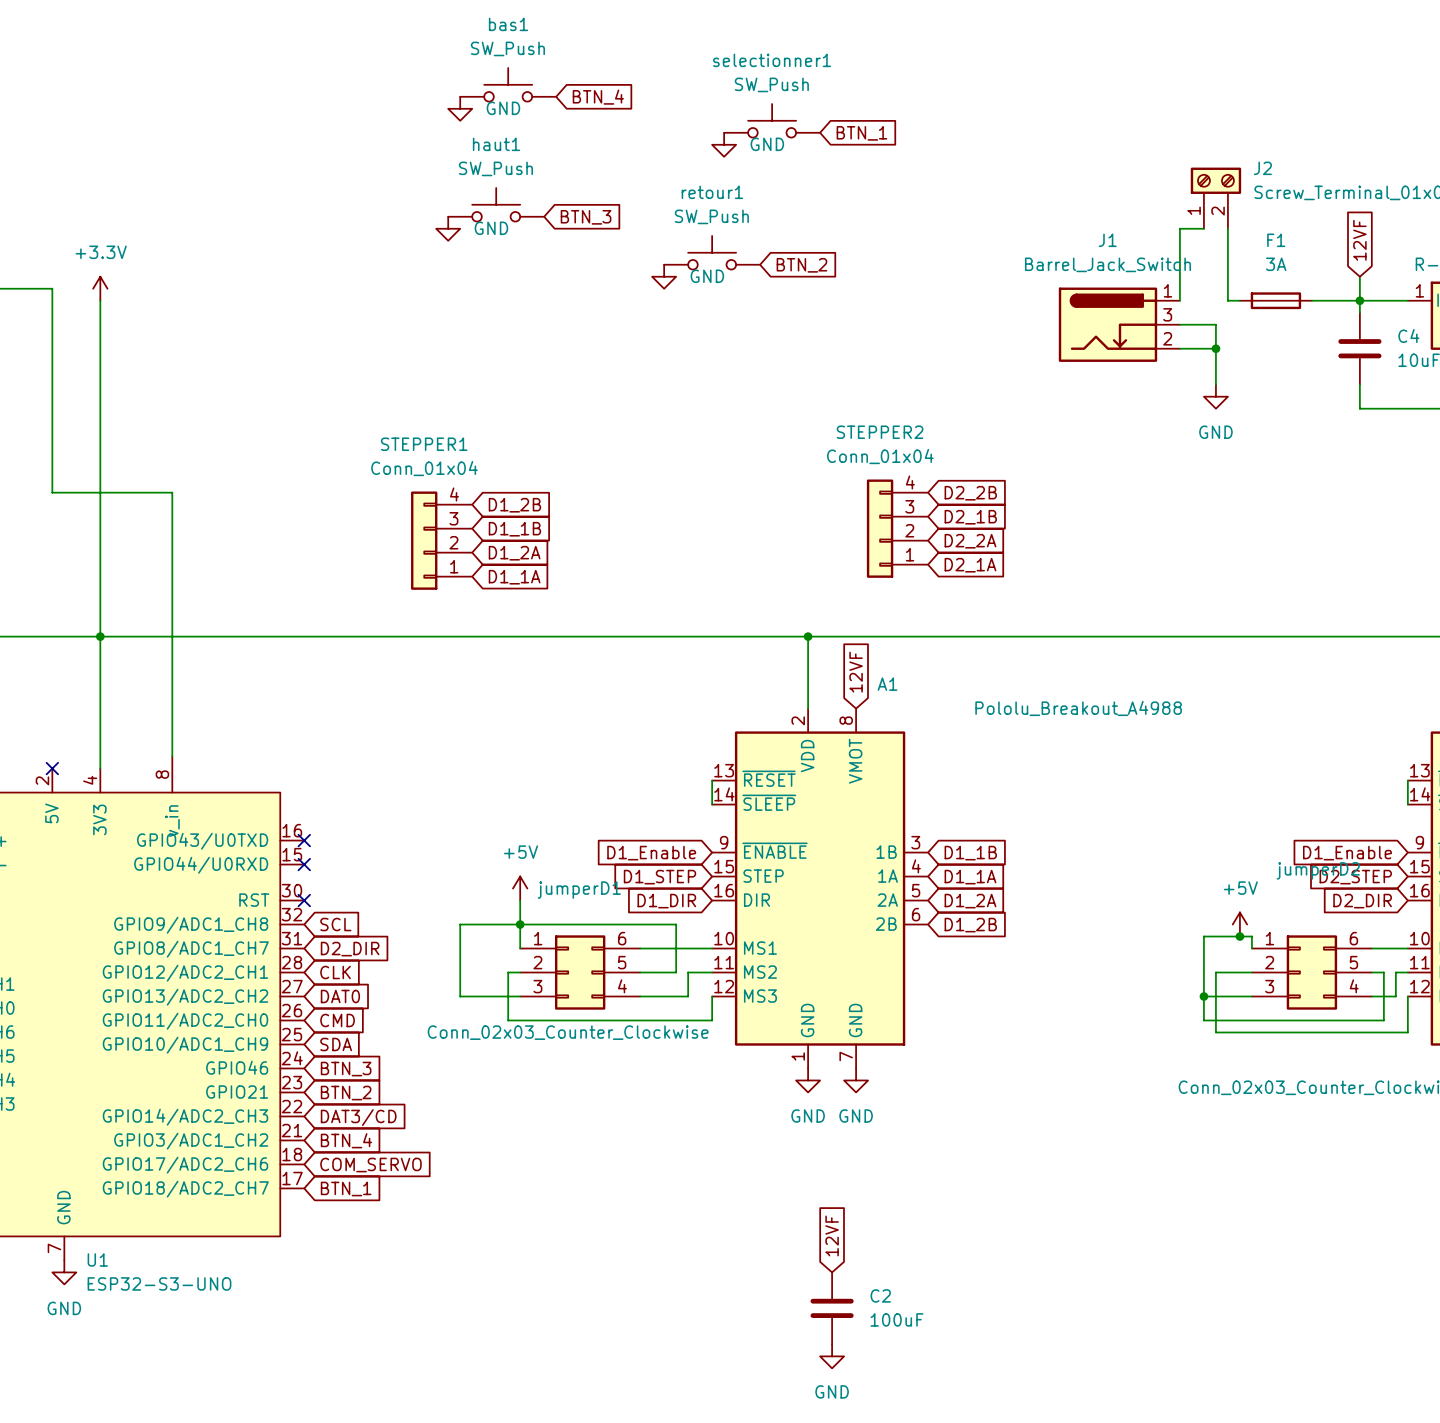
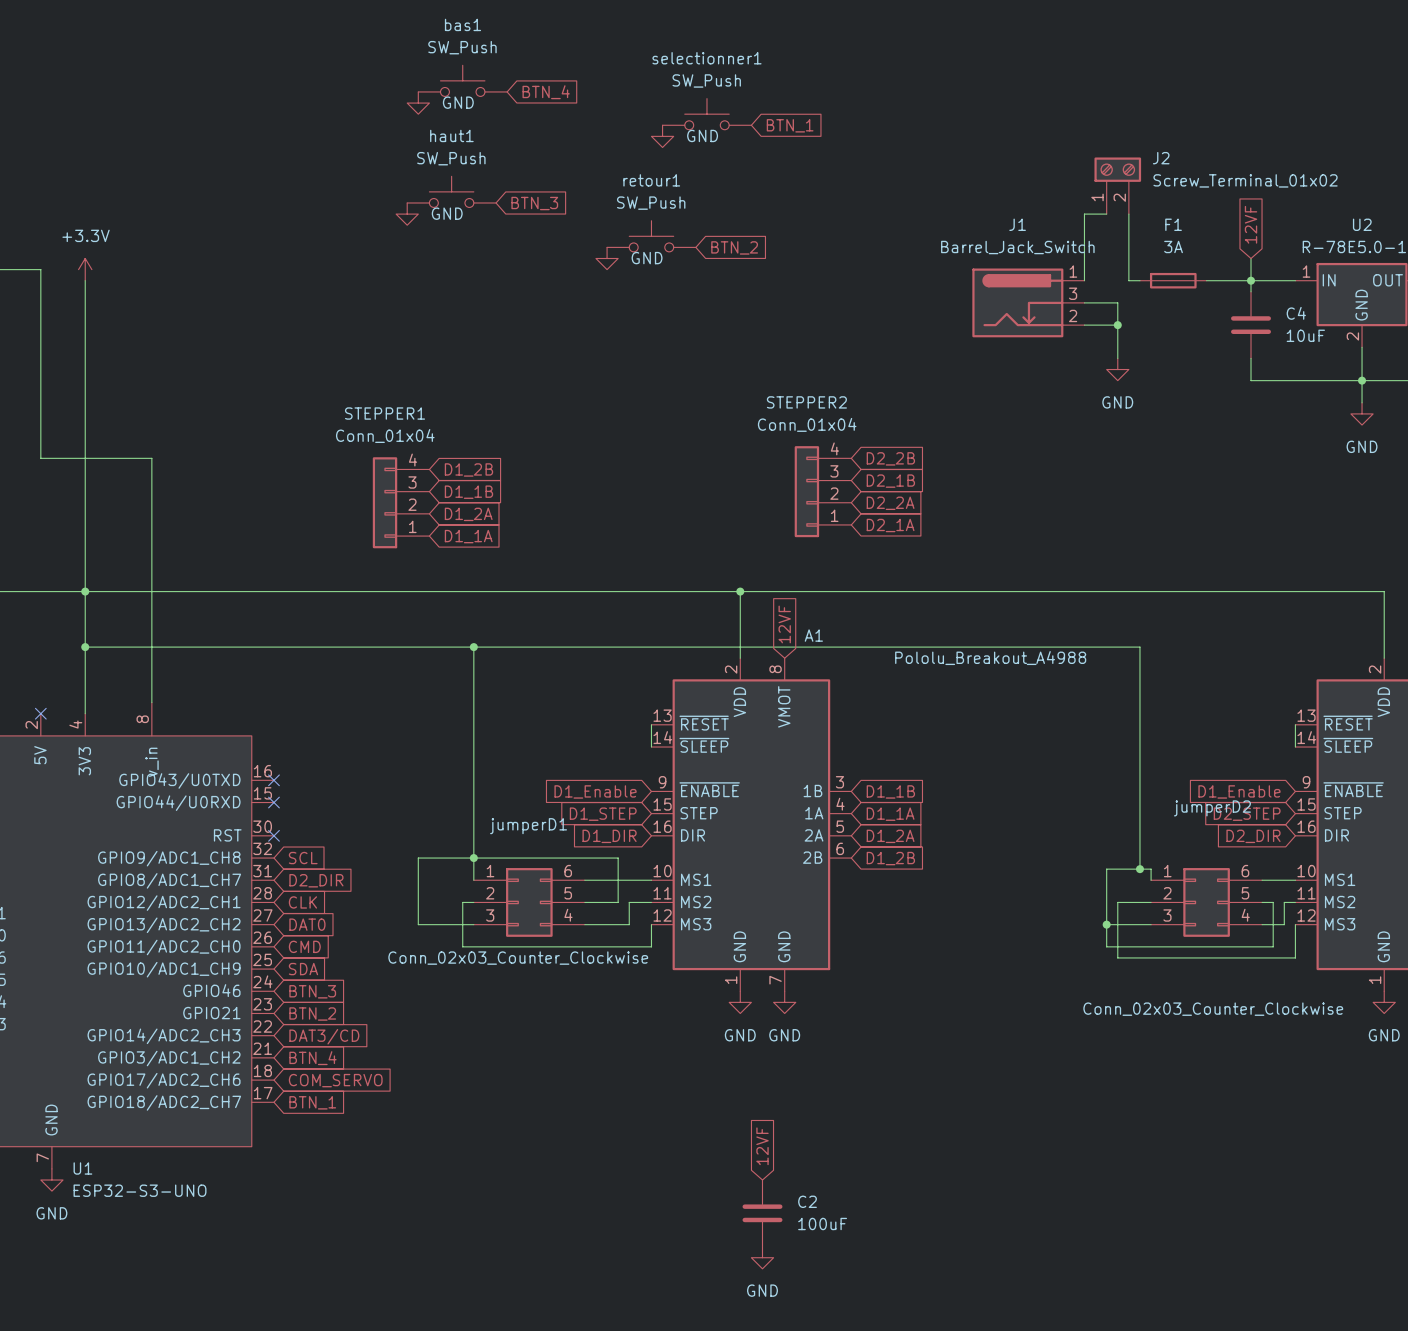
wire: none -> (85, 647) (1139, 647) (1139, 869)
junction: none -> (85, 647)
wire: none -> (473, 647) (473, 835)
junction: none -> (473, 647)
power symbol: +5V (520, 888) -> none
power symbol: +5V (1239, 924) -> none

